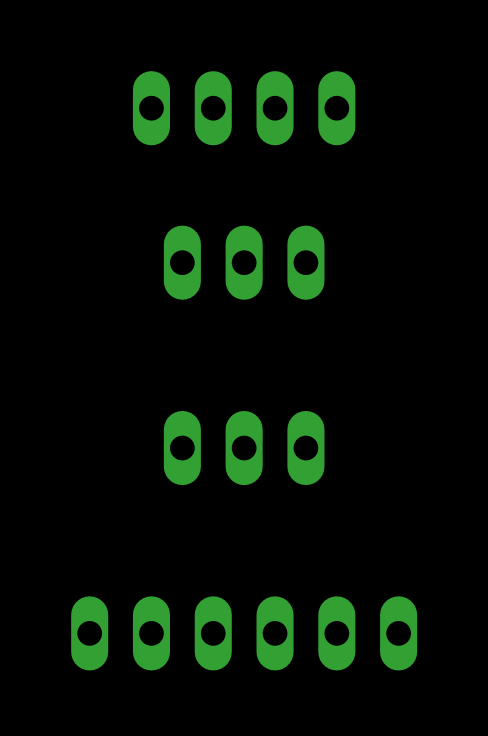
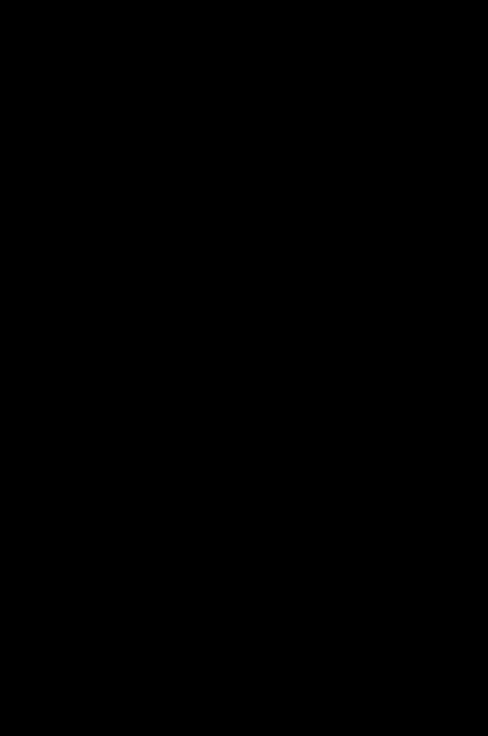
part: (244, 108) -> none
part: (244, 262) -> none
part: (244, 448) -> none
part: (244, 633) -> none

